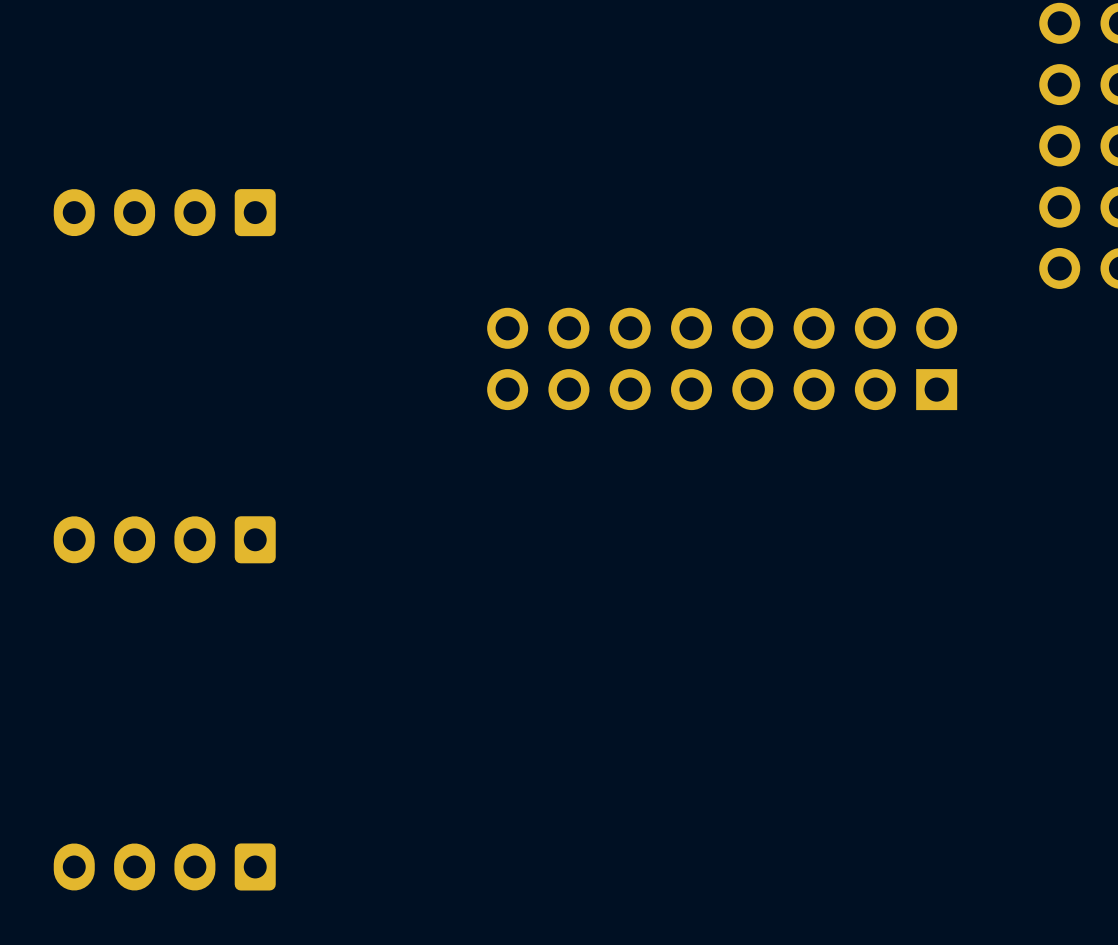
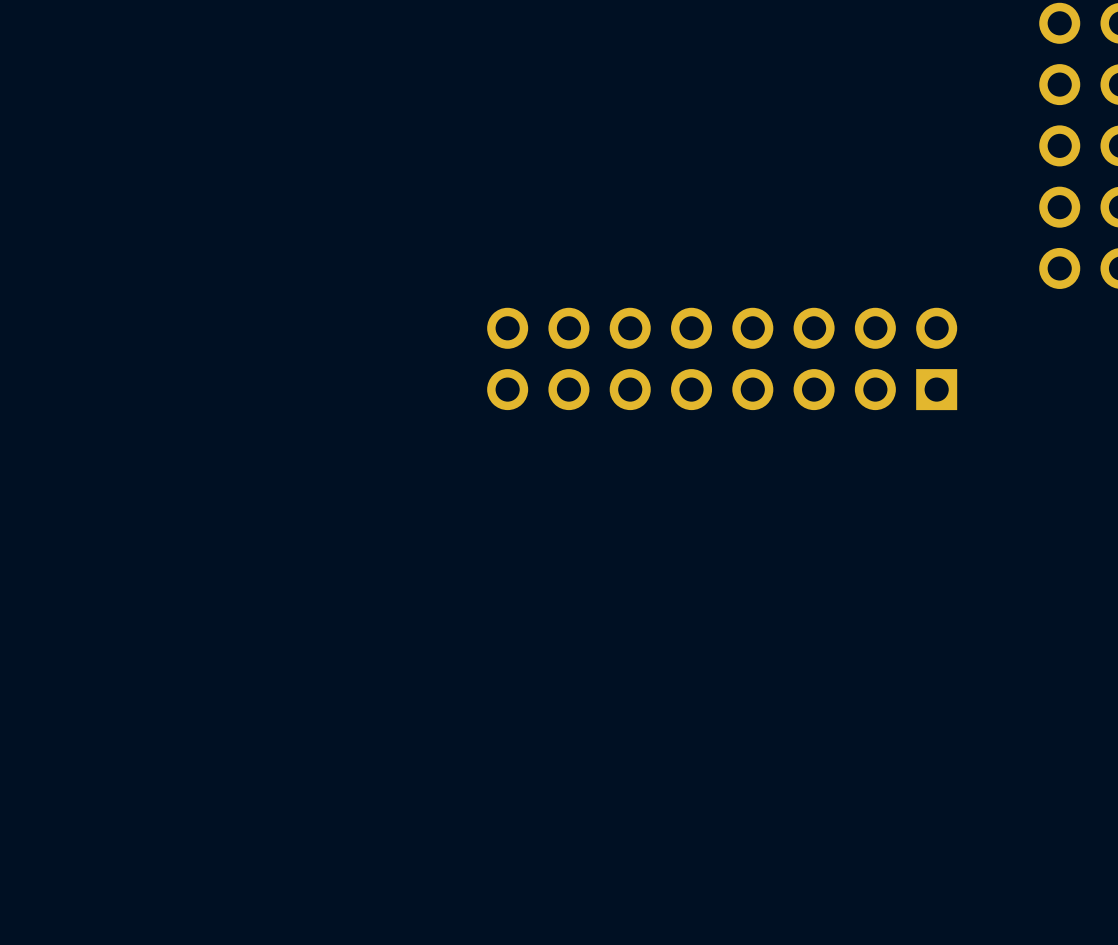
part: (164, 212) -> none
part: (164, 539) -> none
part: (164, 866) -> none

